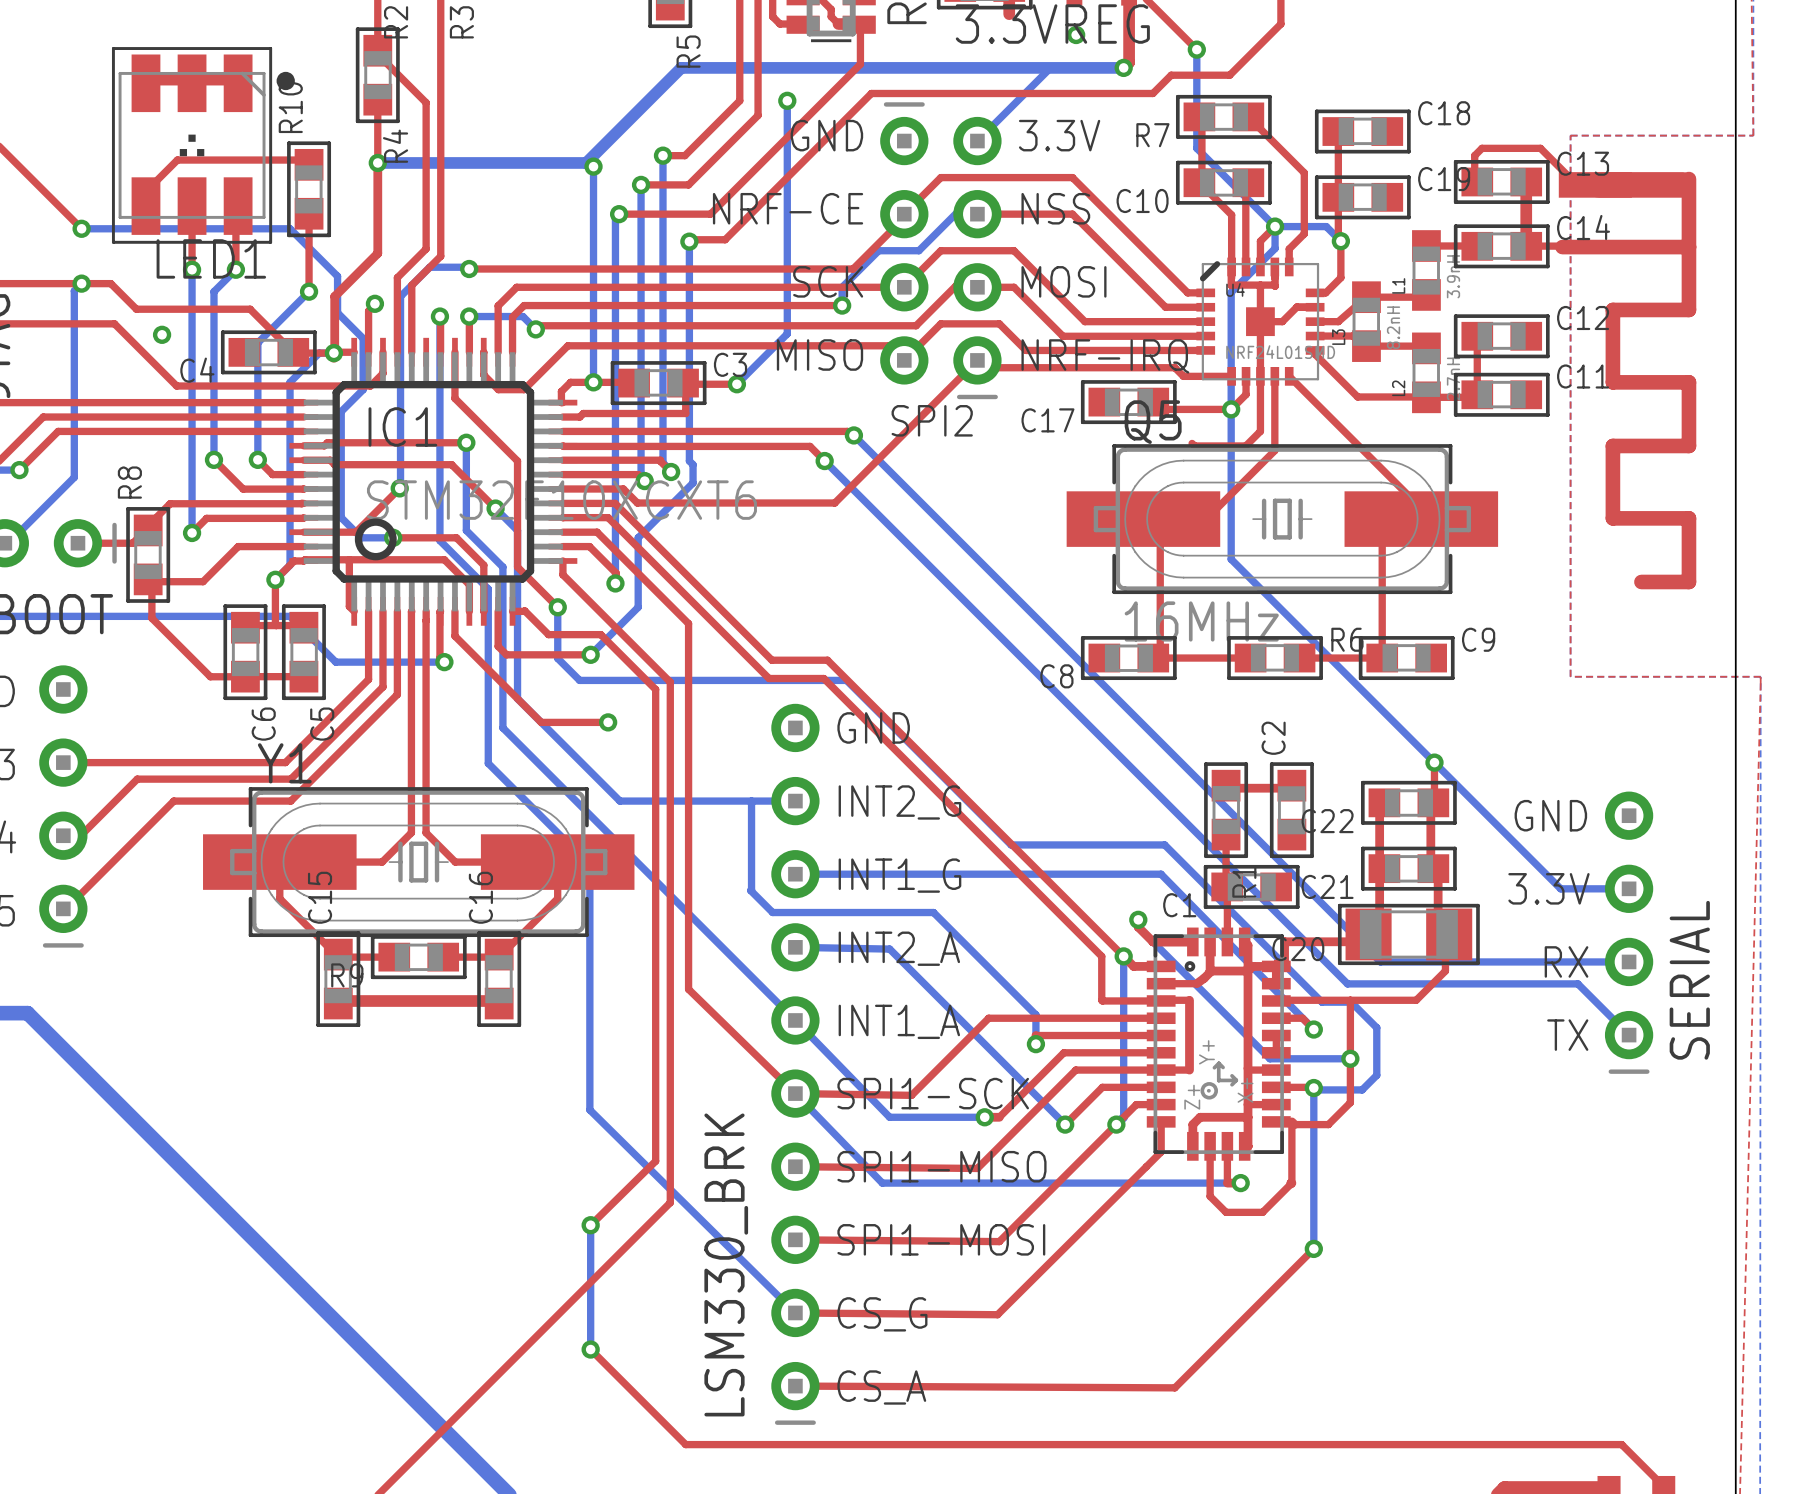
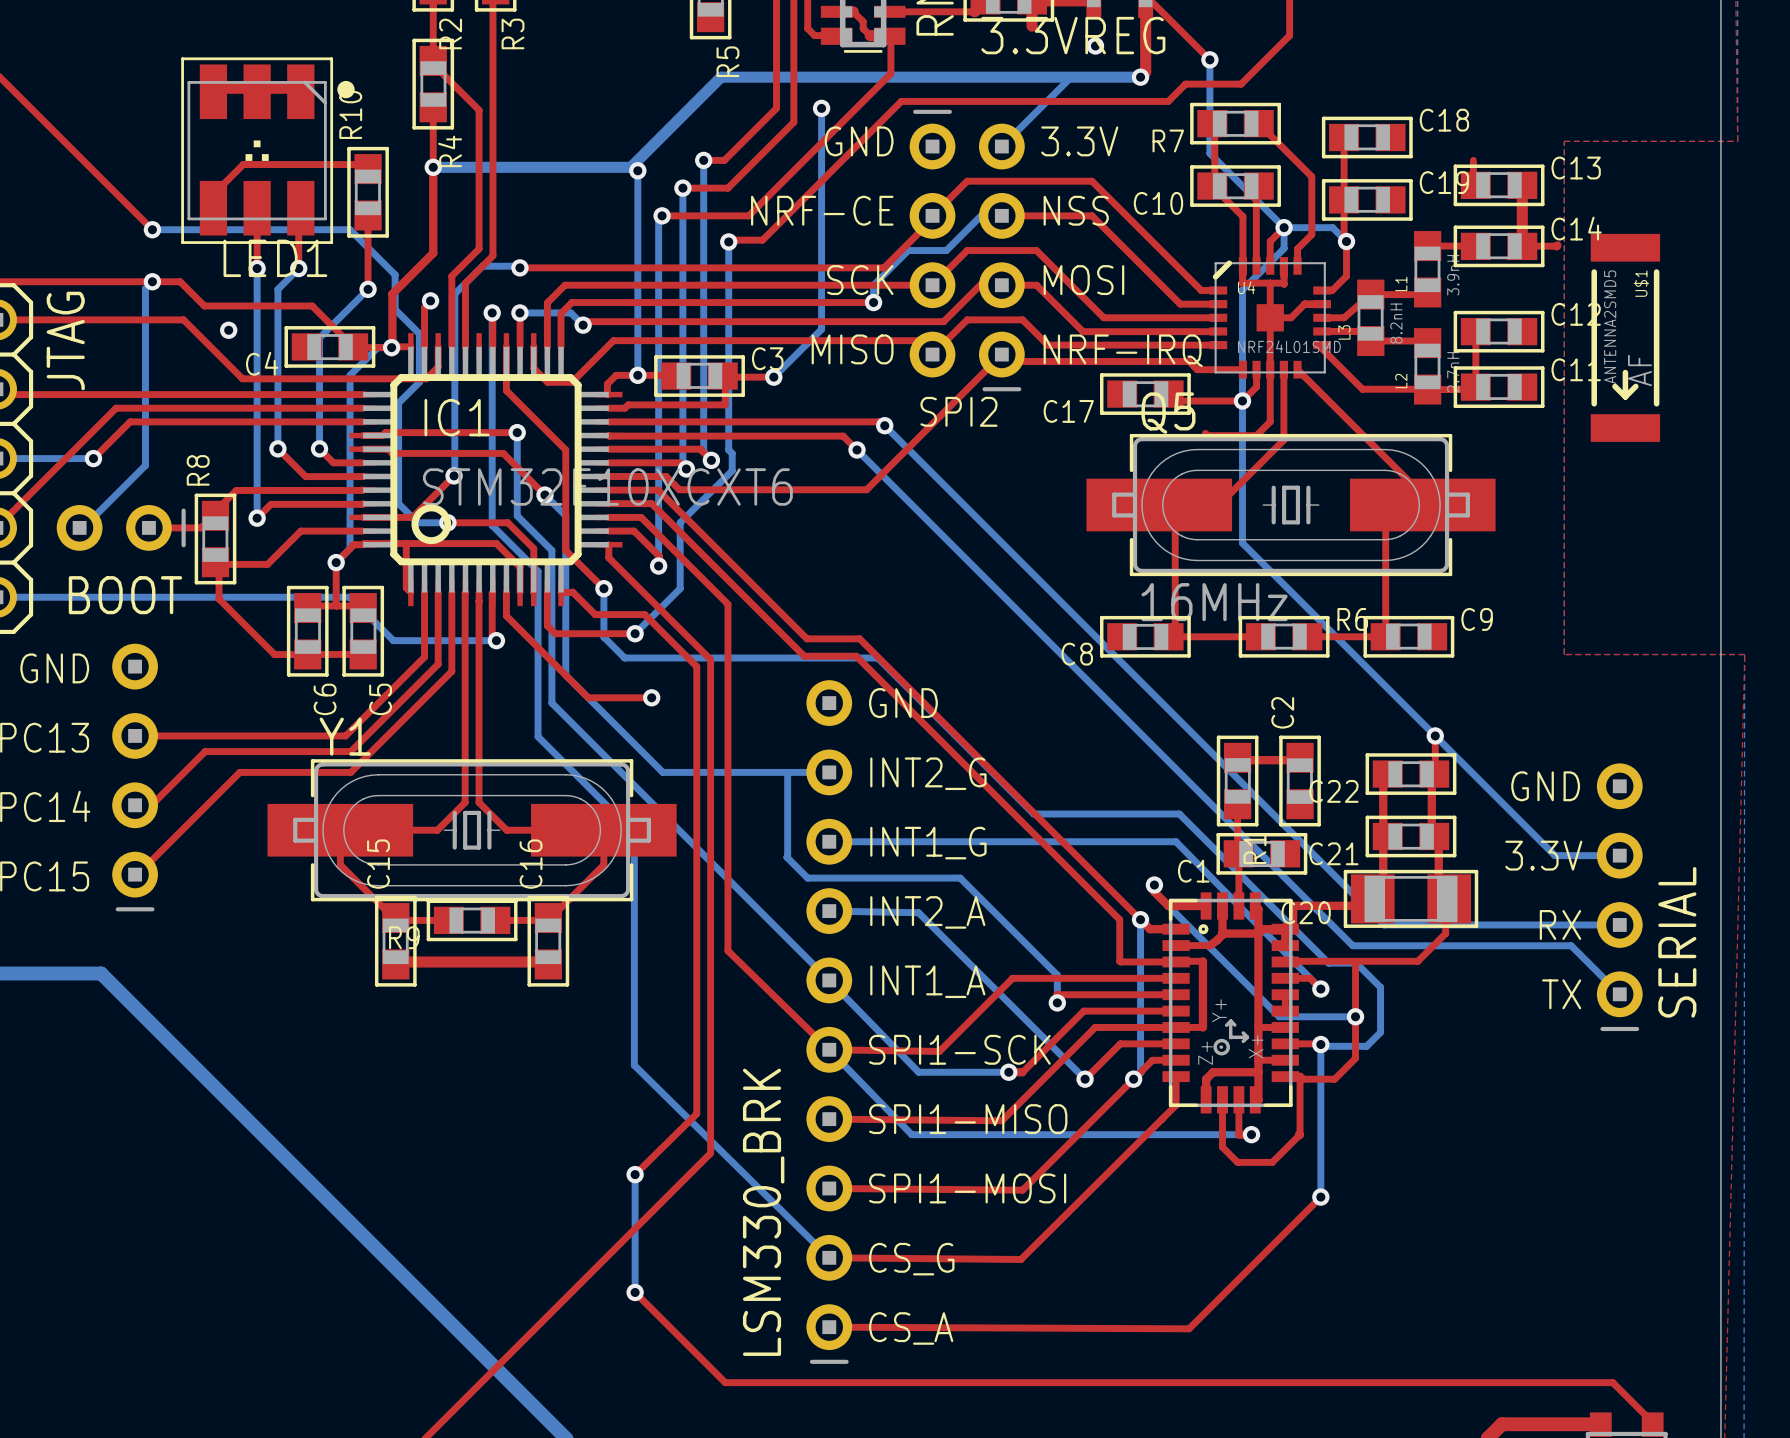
top track: (1474, 155) (1482, 148) (1540, 148) (1577, 184) (1595, 184) -> none
U$1: none -> ANTENNA2SMD5 (1625, 337)
part: (1625, 380) -> none

